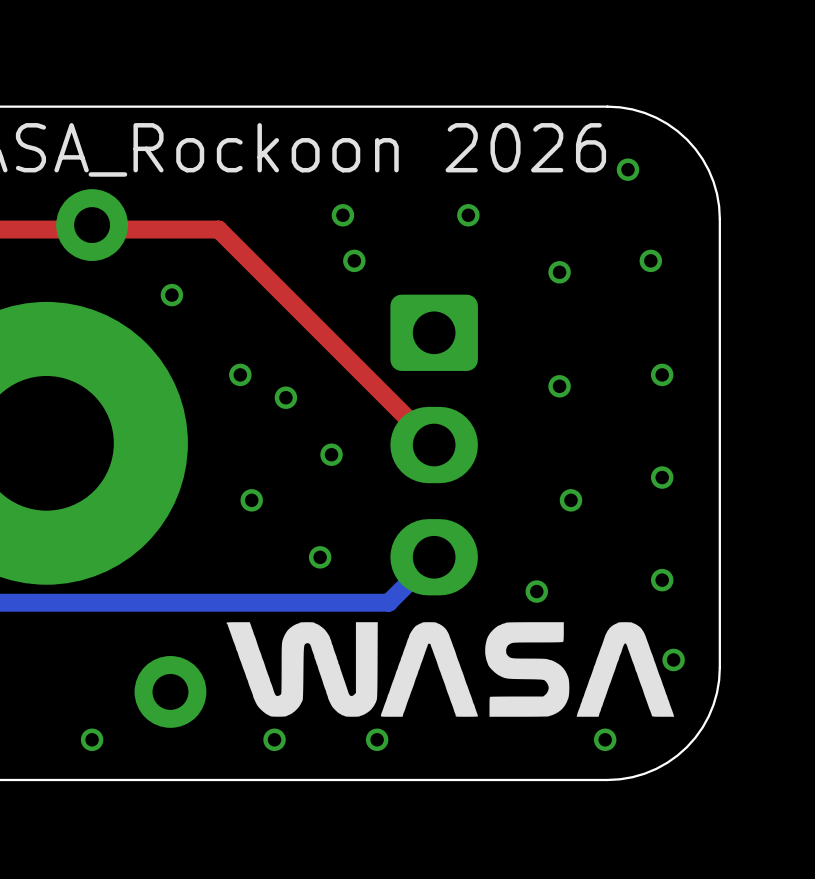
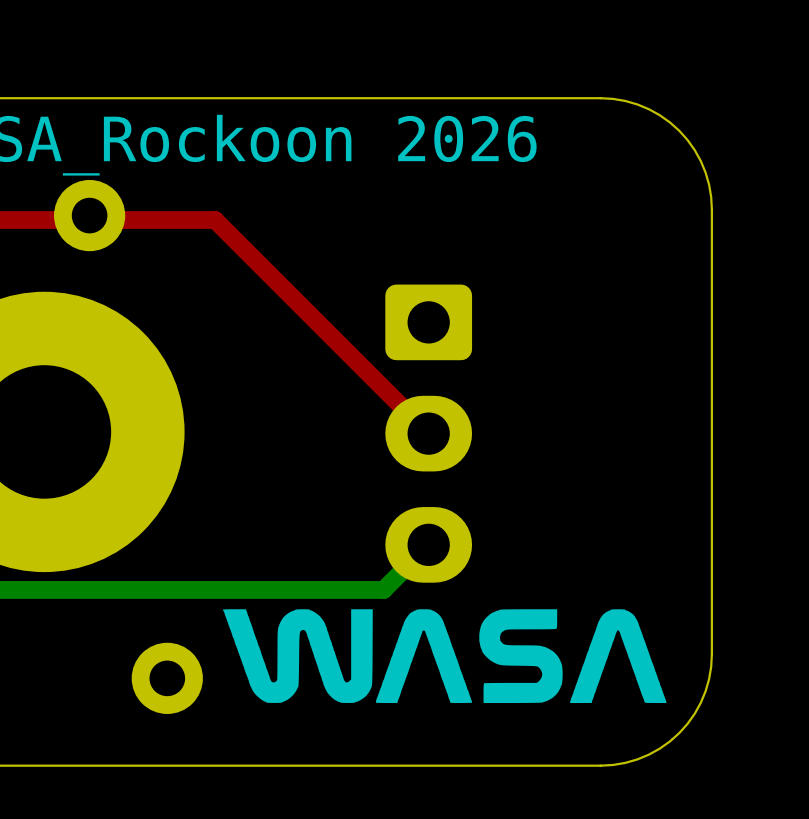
via: (627, 169) -> none
via: (342, 215) -> none
via: (468, 215) -> none
via: (354, 260) -> none
via: (650, 260) -> none
via: (559, 272) -> none
via: (171, 295) -> none
via: (240, 374) -> none
via: (662, 374) -> none
via: (559, 386) -> none
via: (285, 397) -> none
via: (331, 454) -> none
via: (662, 477) -> none
via: (251, 500) -> none
via: (570, 500) -> none
via: (320, 557) -> none
via: (662, 580) -> none
via: (536, 591) -> none
via: (673, 659) -> none
via: (92, 739) -> none
via: (274, 739) -> none
via: (377, 739) -> none
via: (605, 739) -> none

